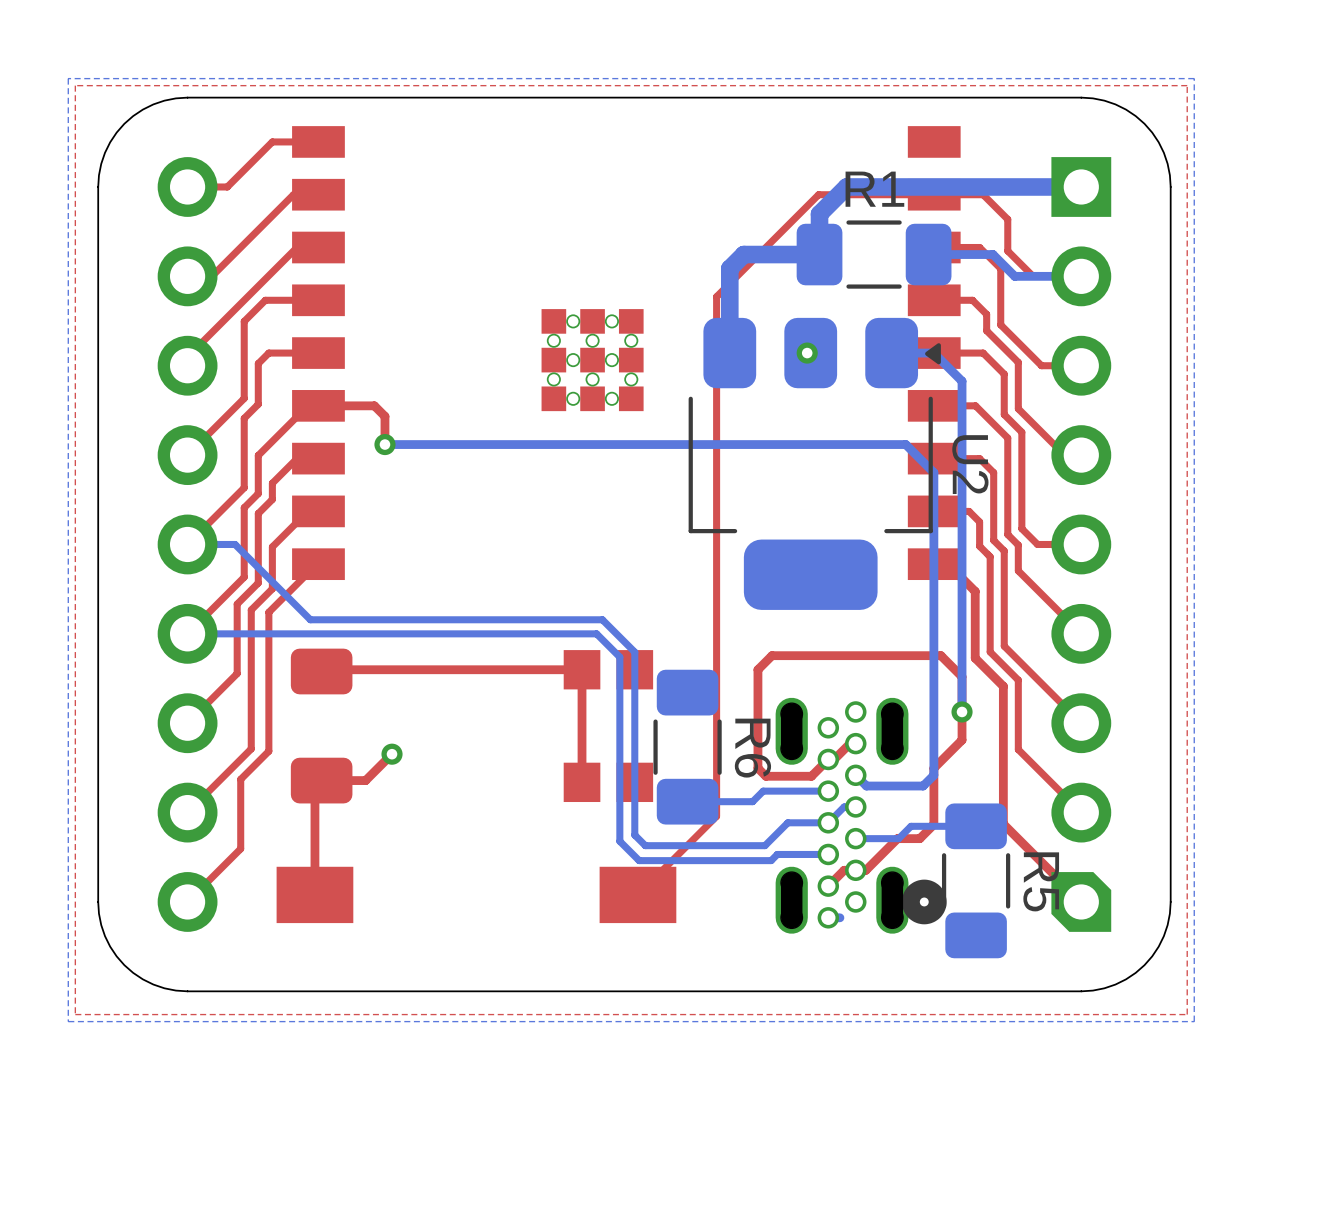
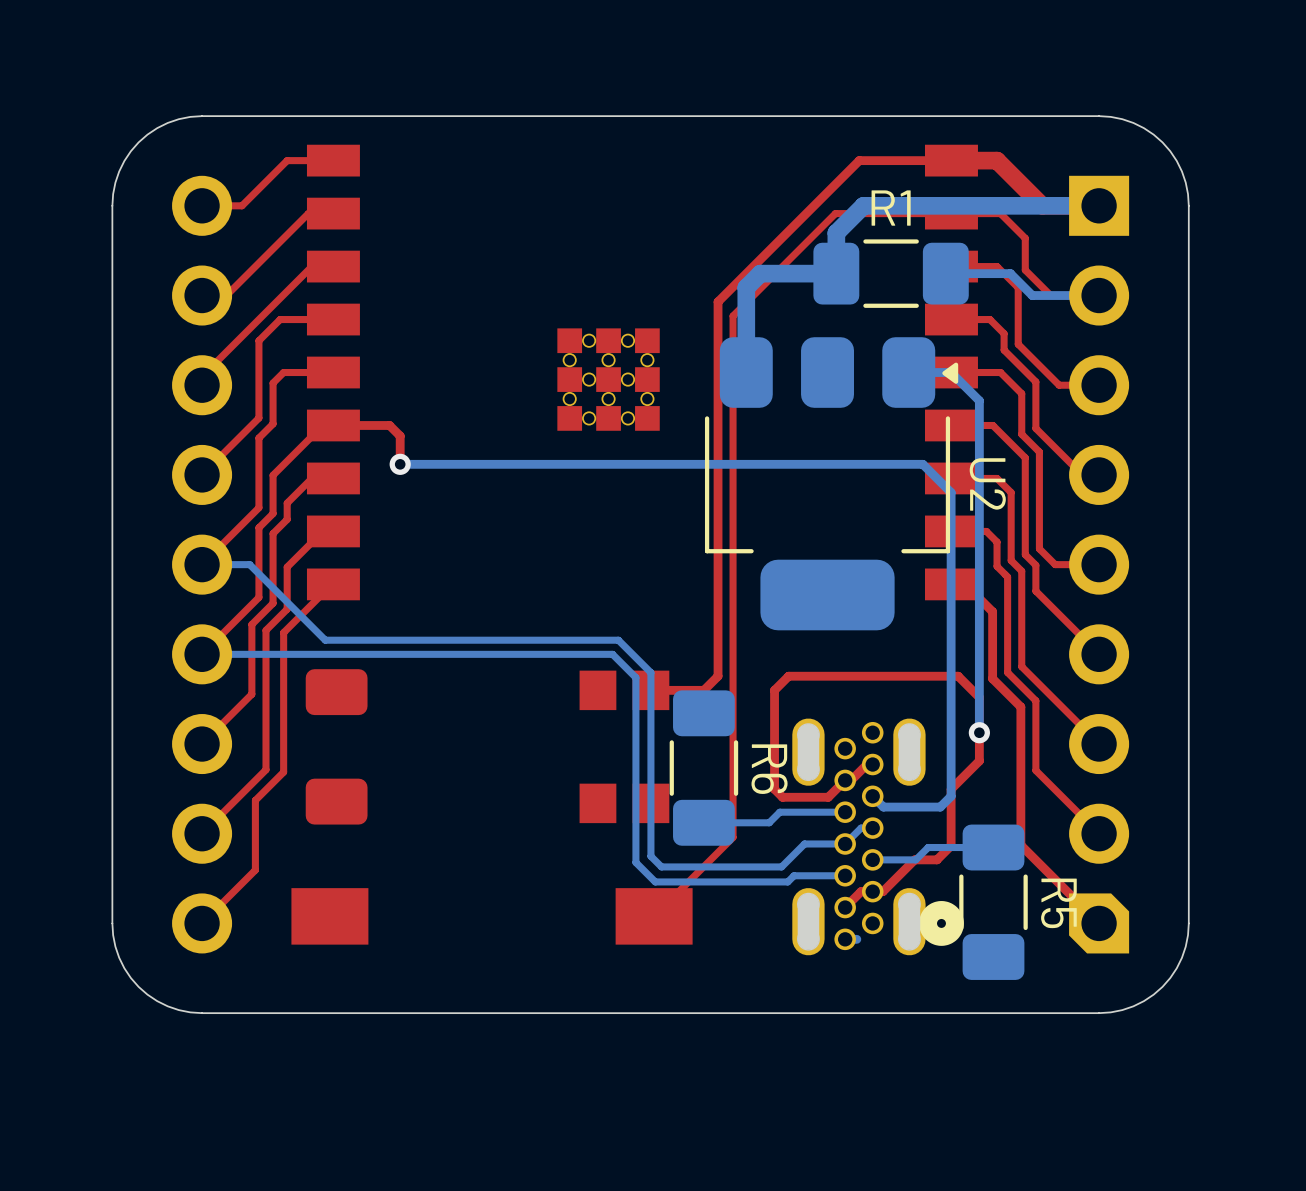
bottom zone outline: (1194, 78) (68, 78) (68, 1021) (1194, 1021) (1194, 78) -> none
top zone outline: (1187, 85) (75, 85) (75, 1014) (1187, 1014) (1187, 85) -> none
top track: none -> (1099, 205) (1042, 205) (997, 160) (859, 160) (718, 301) (718, 676) (703, 690) (650, 690)
via: (807, 353) -> none
top track: (321, 671) (323, 669) (582, 669) (582, 782) -> none
top track: (392, 754) (365, 780) (321, 780) (314, 787) (314, 894) -> none
via: (392, 754) -> none

